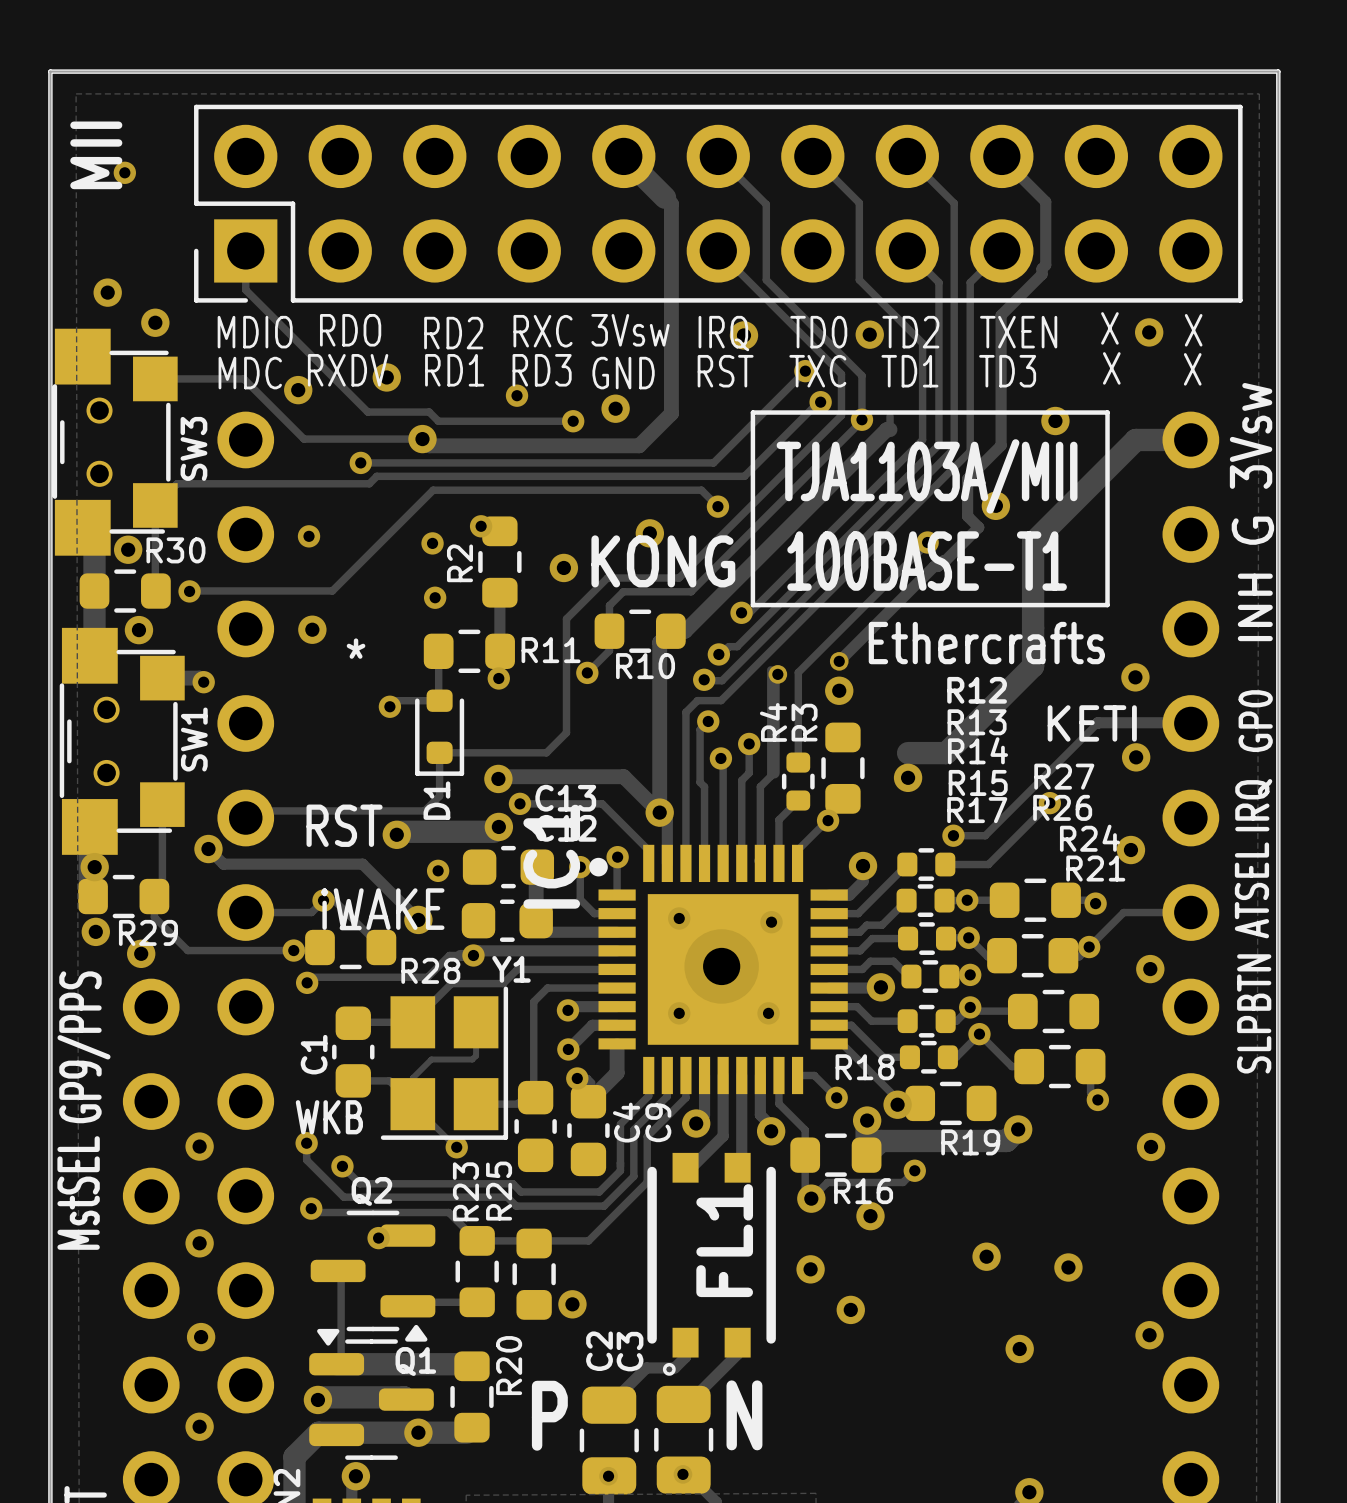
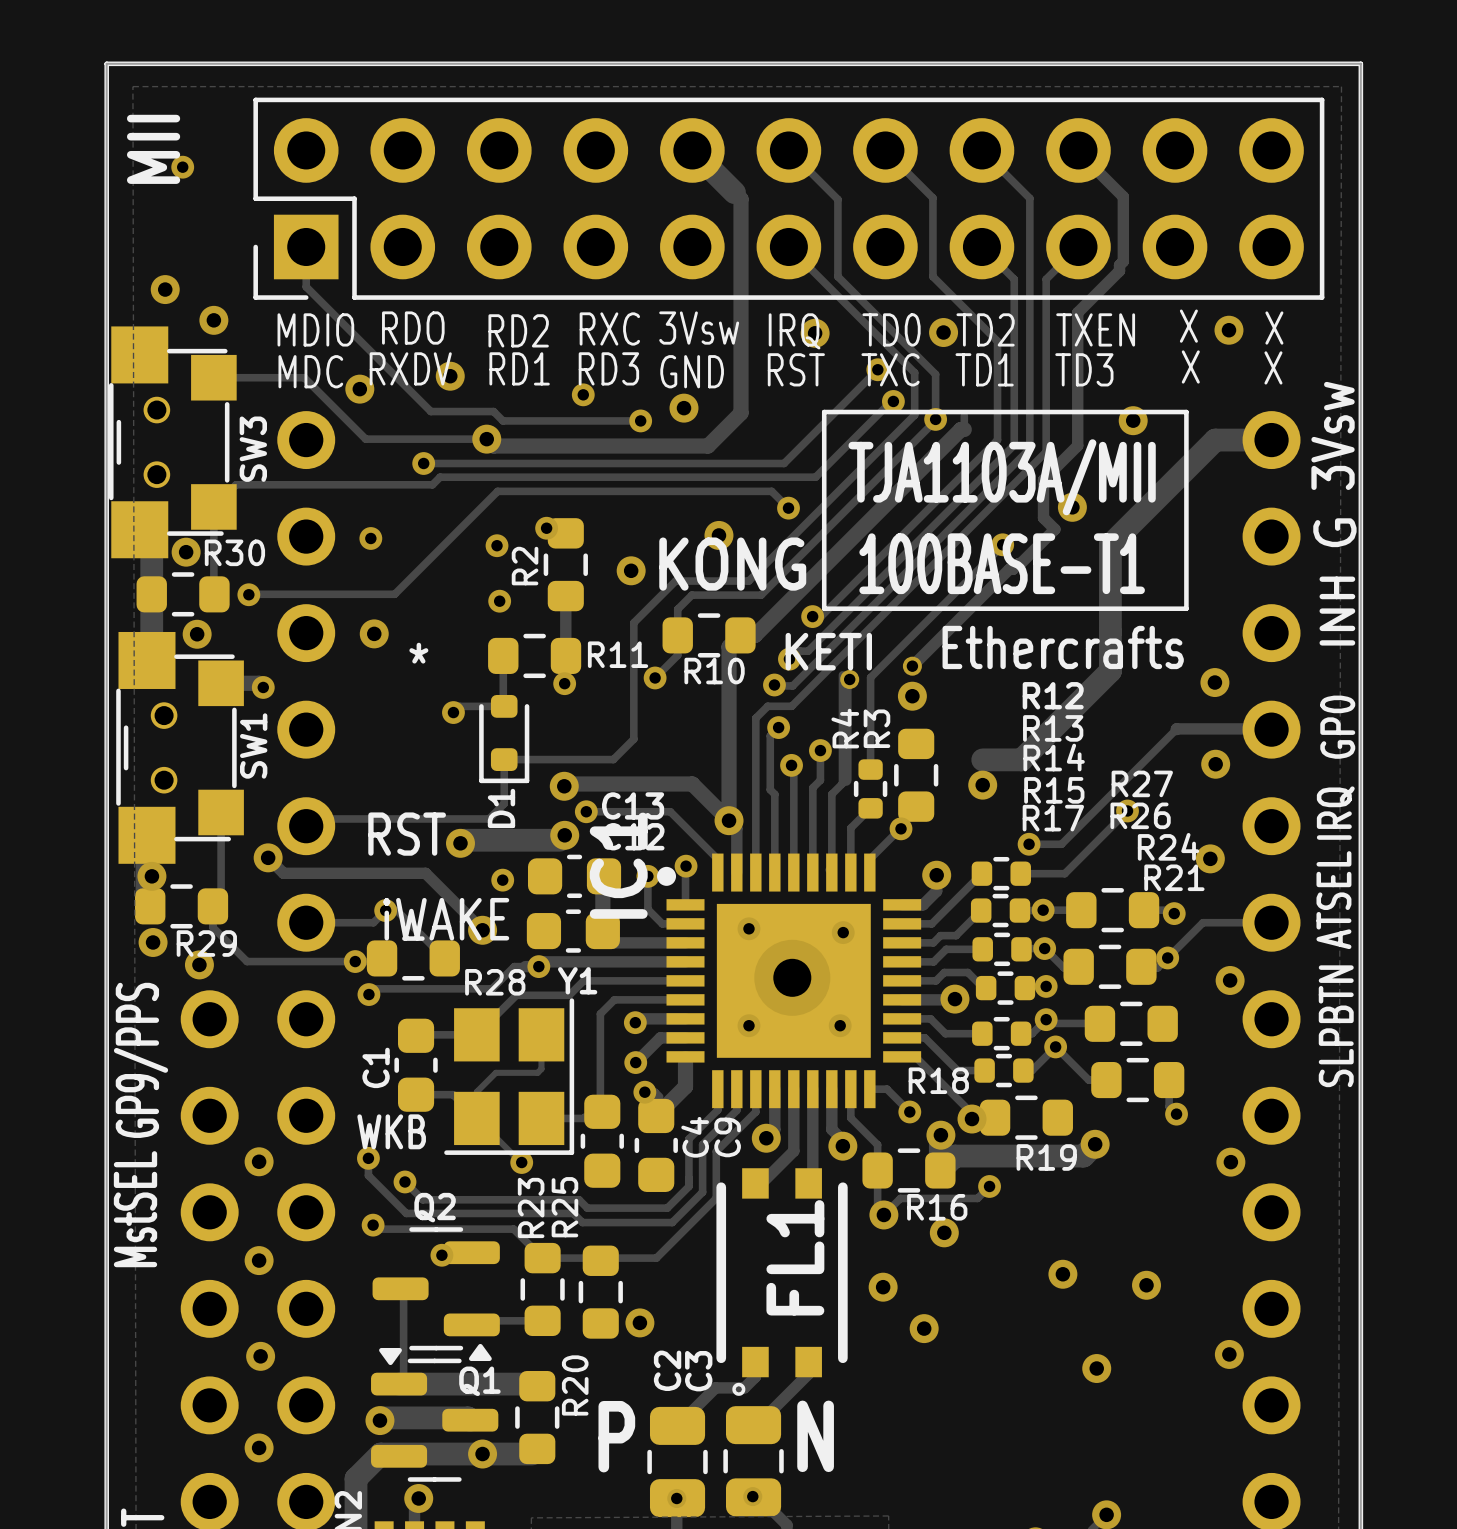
text position: KETI (1092, 723) -> KETI (828, 651)

